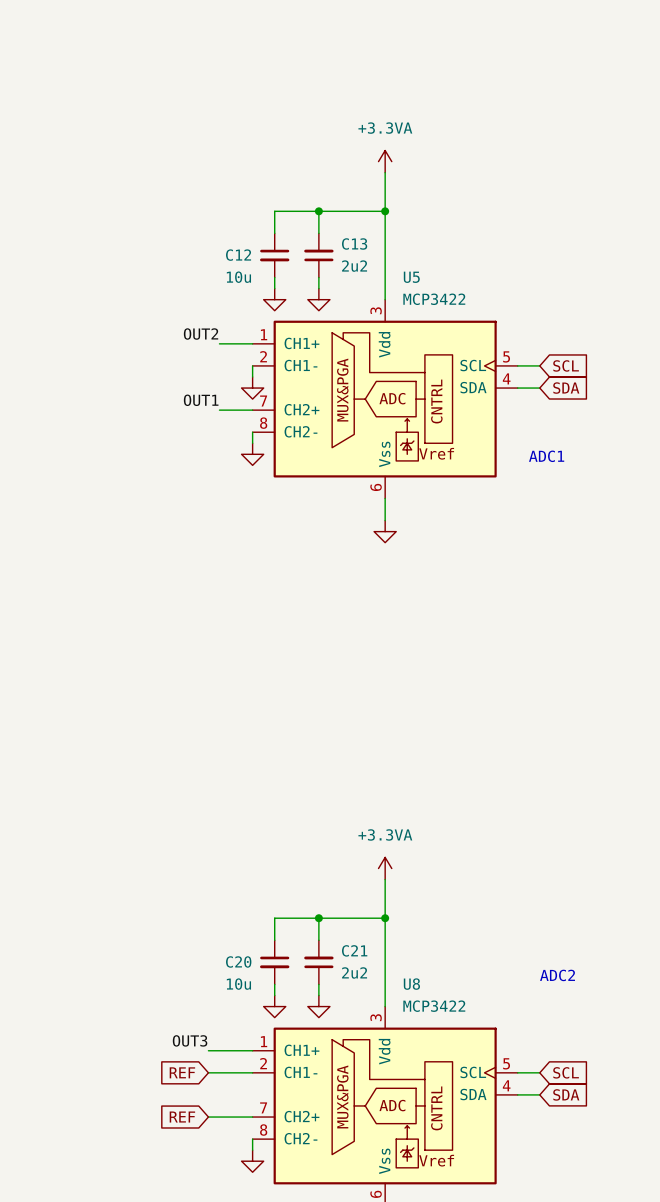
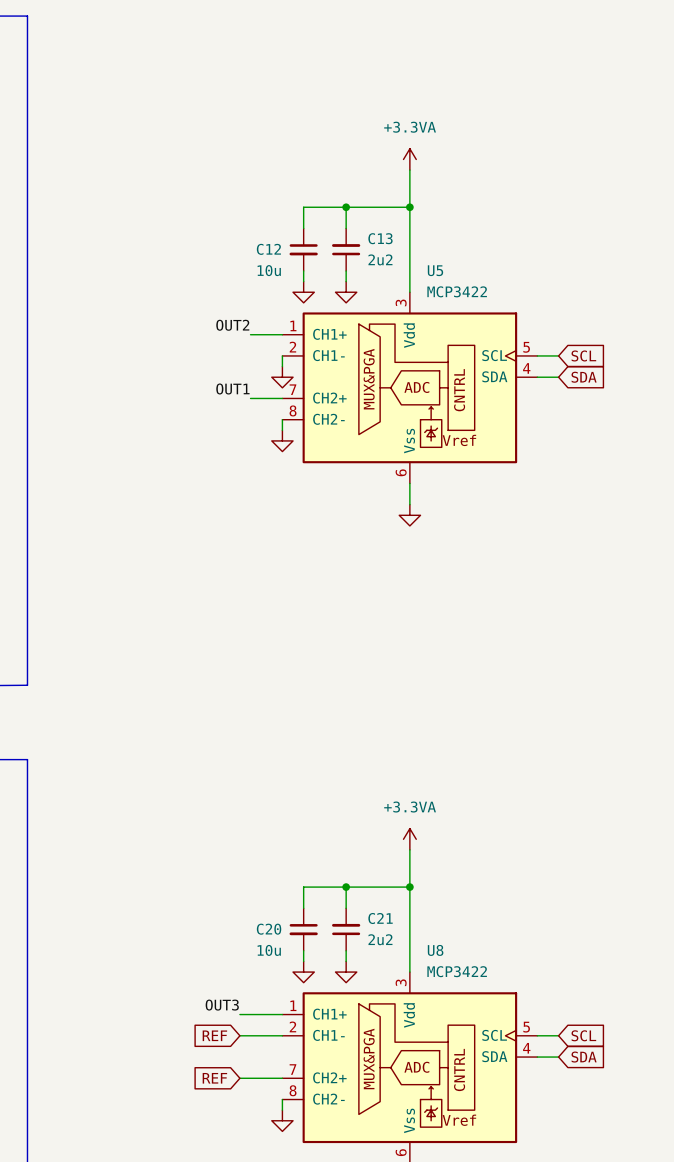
text: ADC1 (546, 456) -> none
text: ADC2 (557, 975) -> none

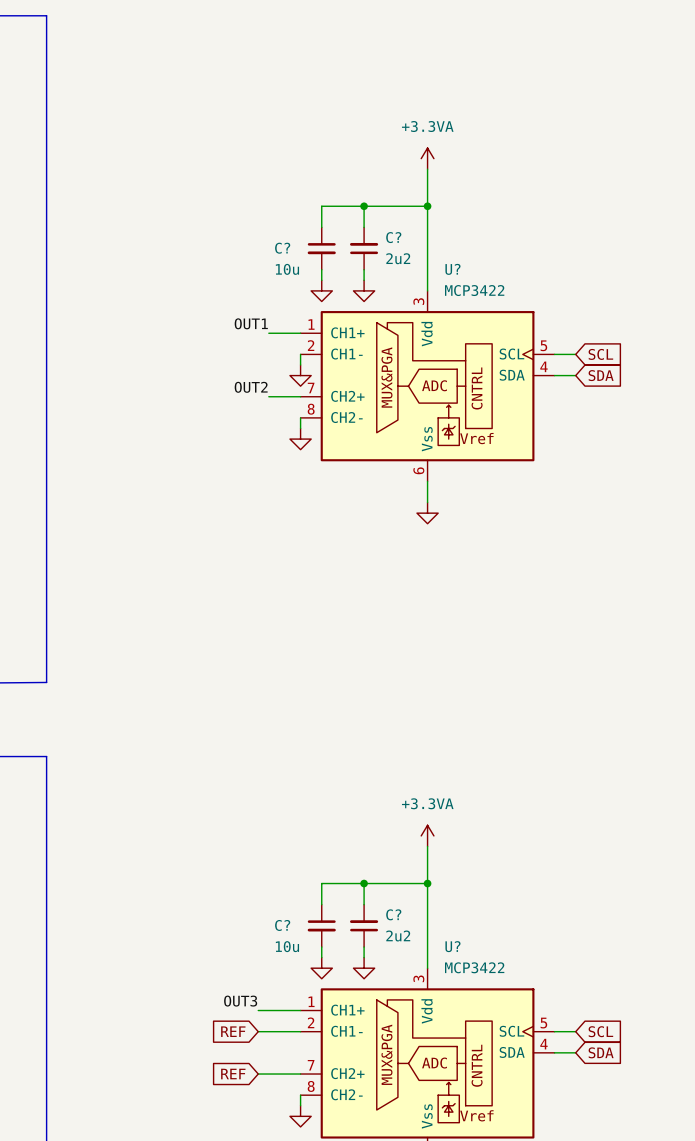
C13 name: C13 (380, 238) -> C? (393, 237)
C12 name: C12 (268, 249) -> C? (282, 248)
U5 name: U5 (435, 270) -> U? (452, 269)
label: OUT2 (232, 325) -> OUT1 (251, 323)
label: OUT1 (232, 388) -> OUT2 (251, 387)
C21 name: C21 (380, 918) -> C? (393, 914)
C20 name: C20 (269, 929) -> C? (282, 925)
U8 name: U8 (435, 950) -> U? (452, 946)

